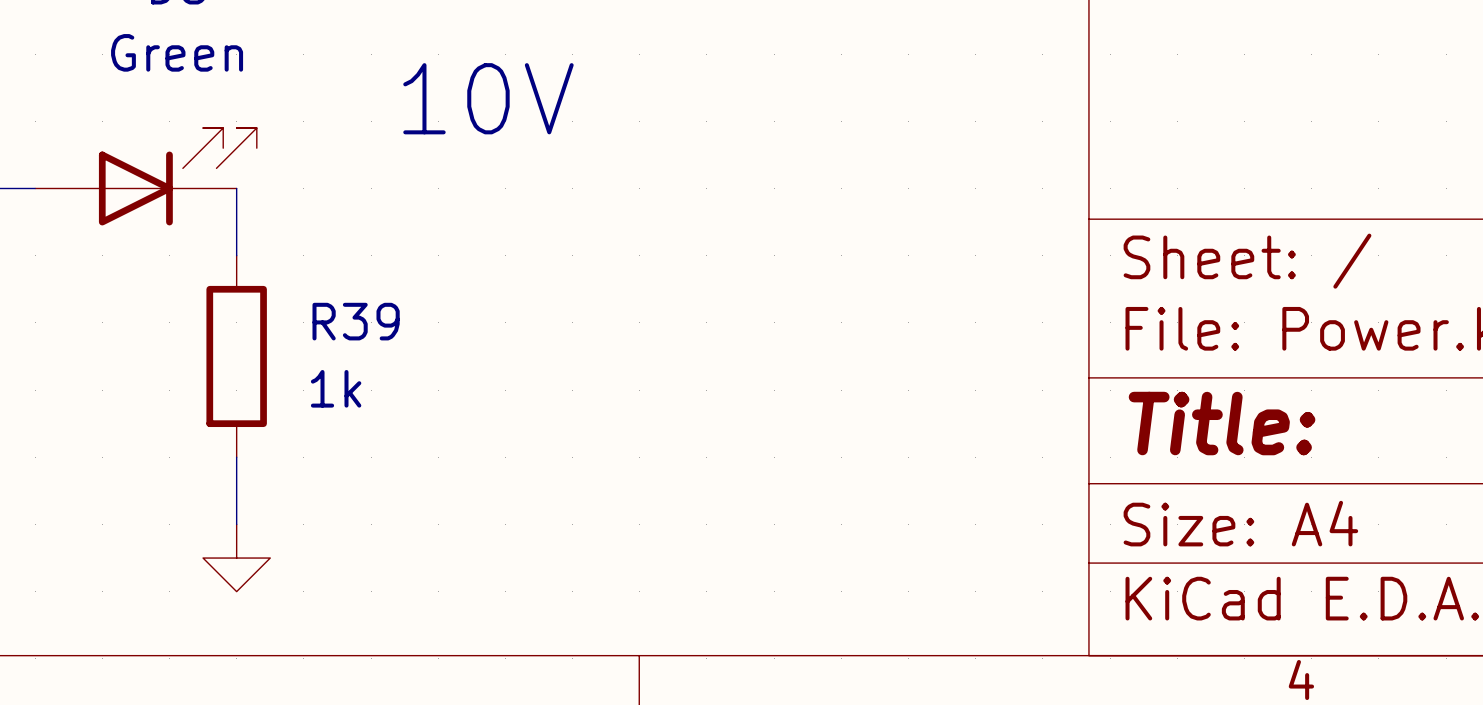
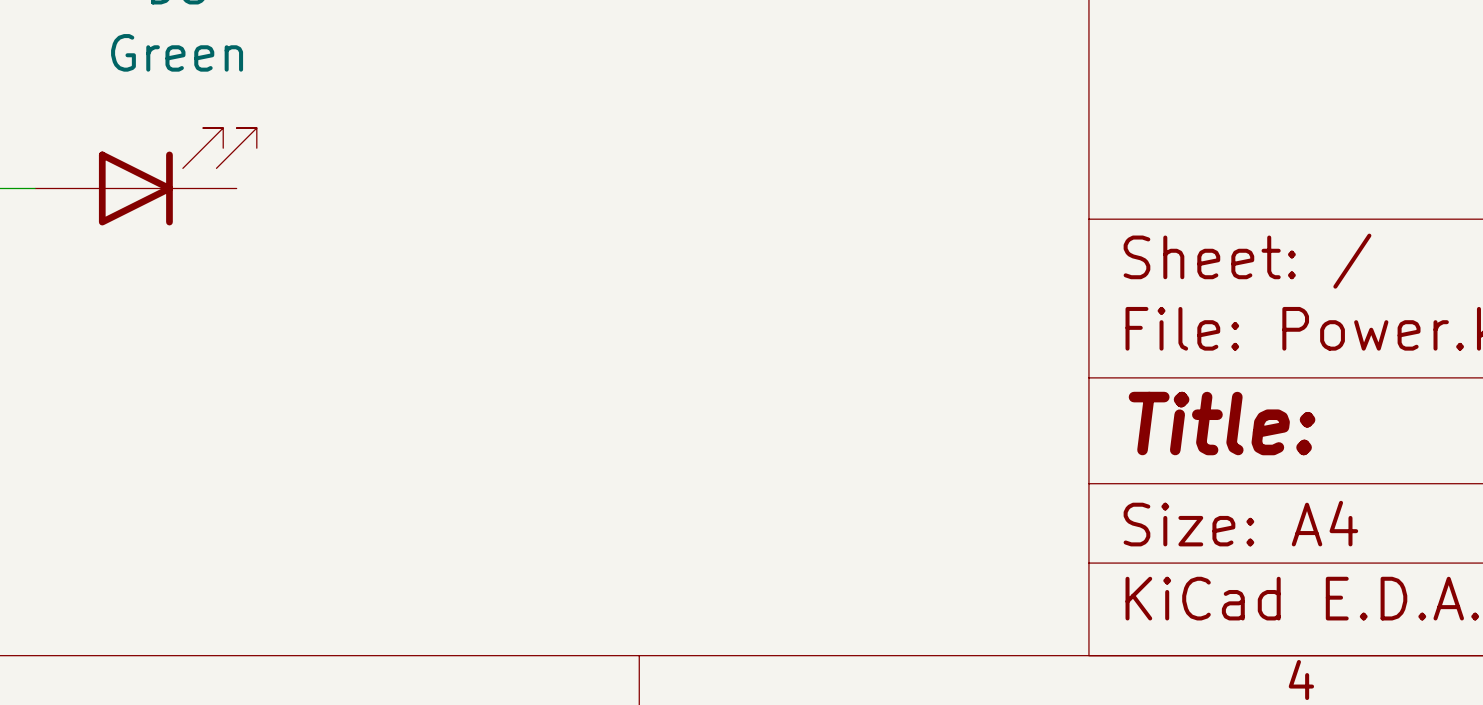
text: 10V (488, 98) -> none
wire: (236, 188) (236, 255) -> none
R39: 1k (236, 356) -> none
wire: (236, 457) (236, 524) -> none
power symbol: (236, 558) -> none

